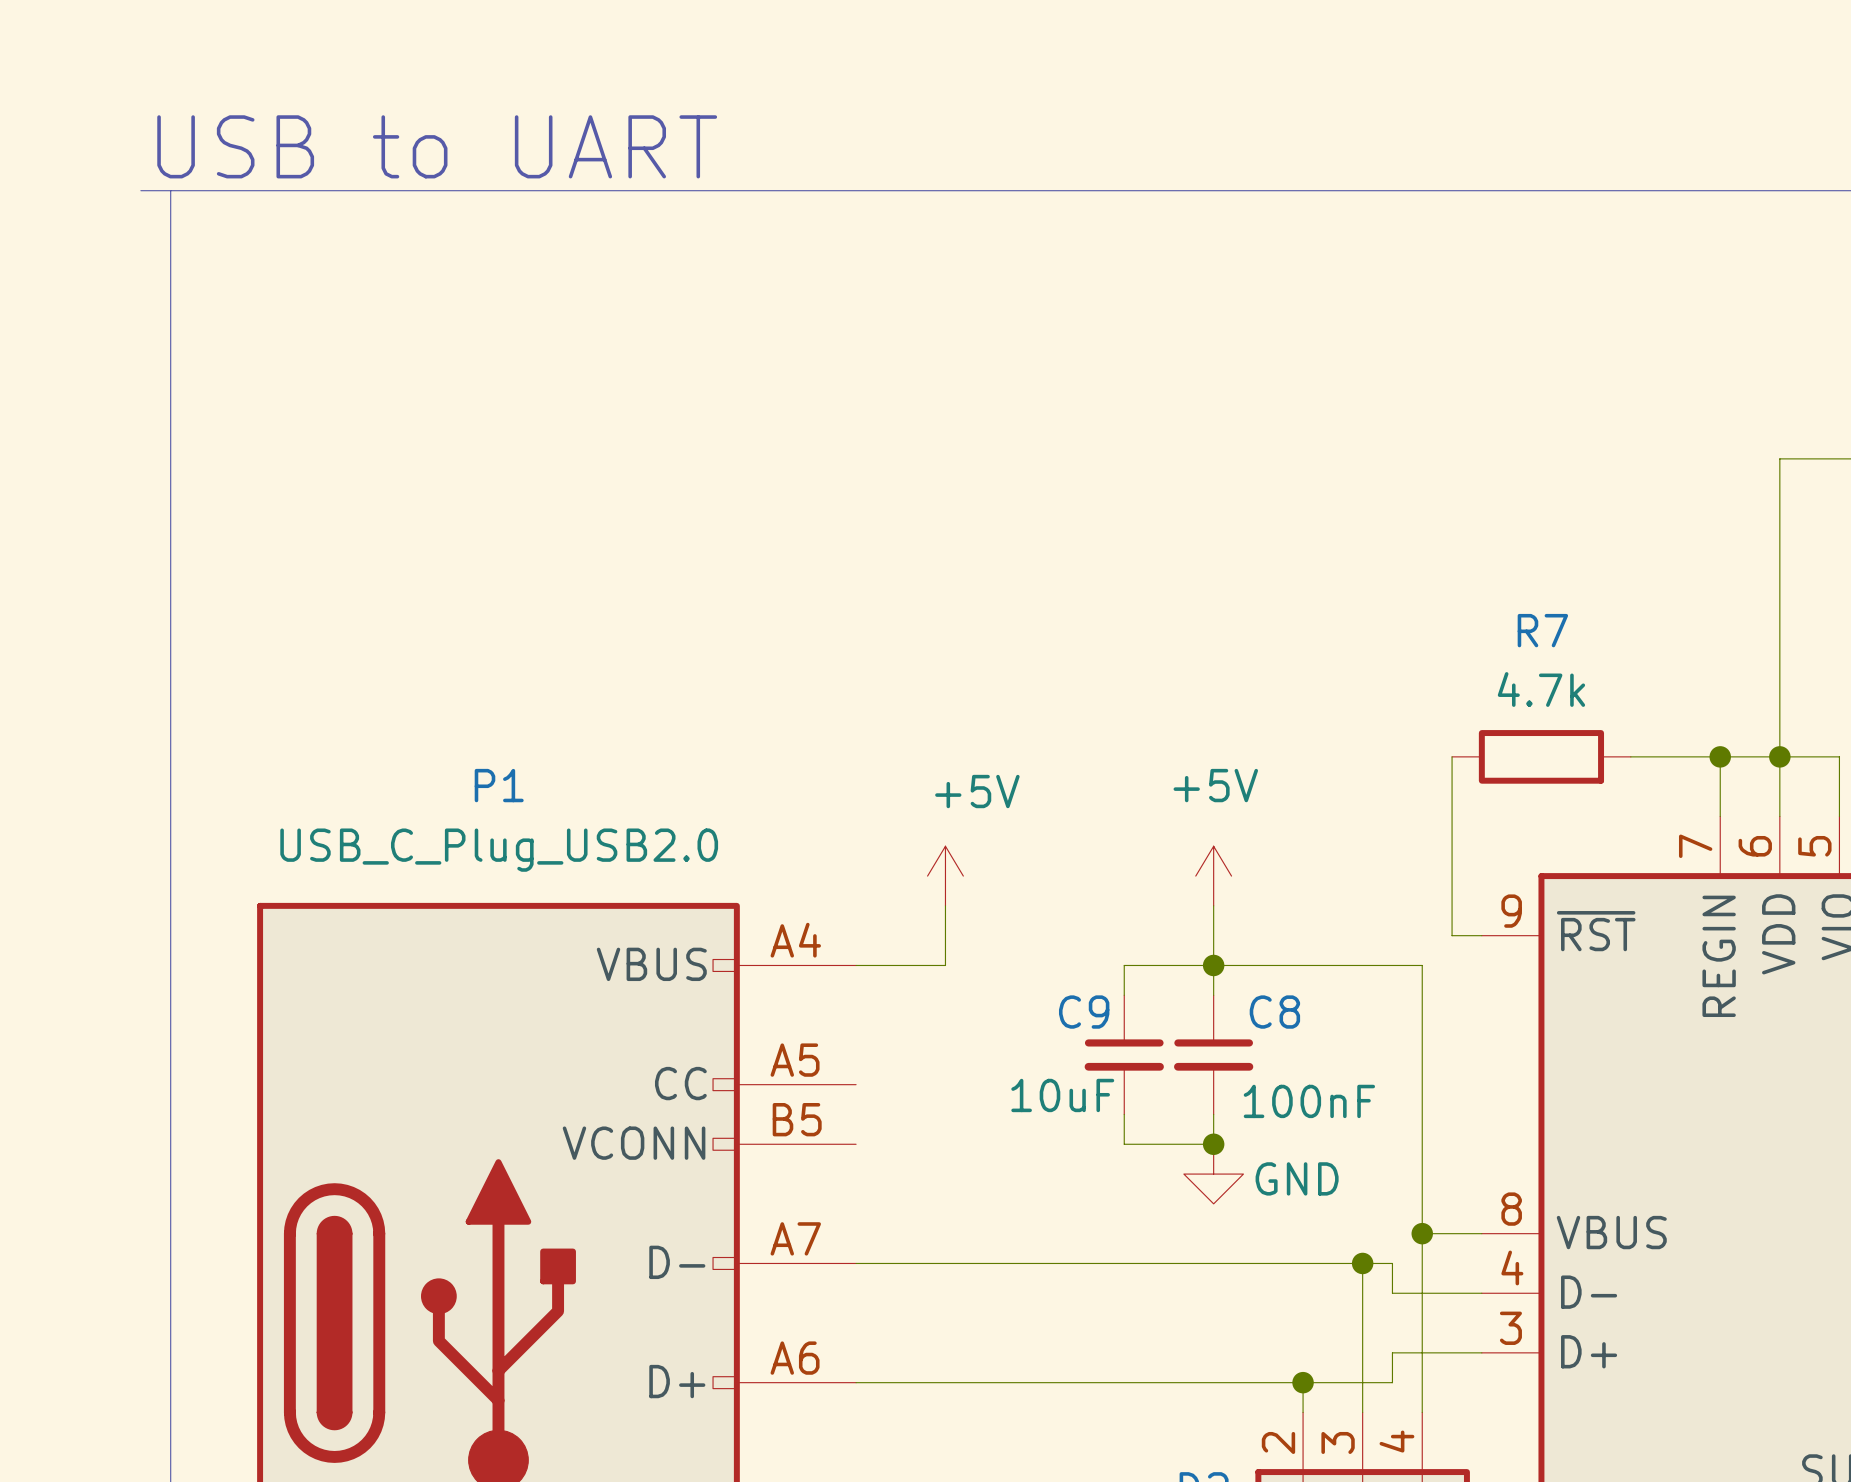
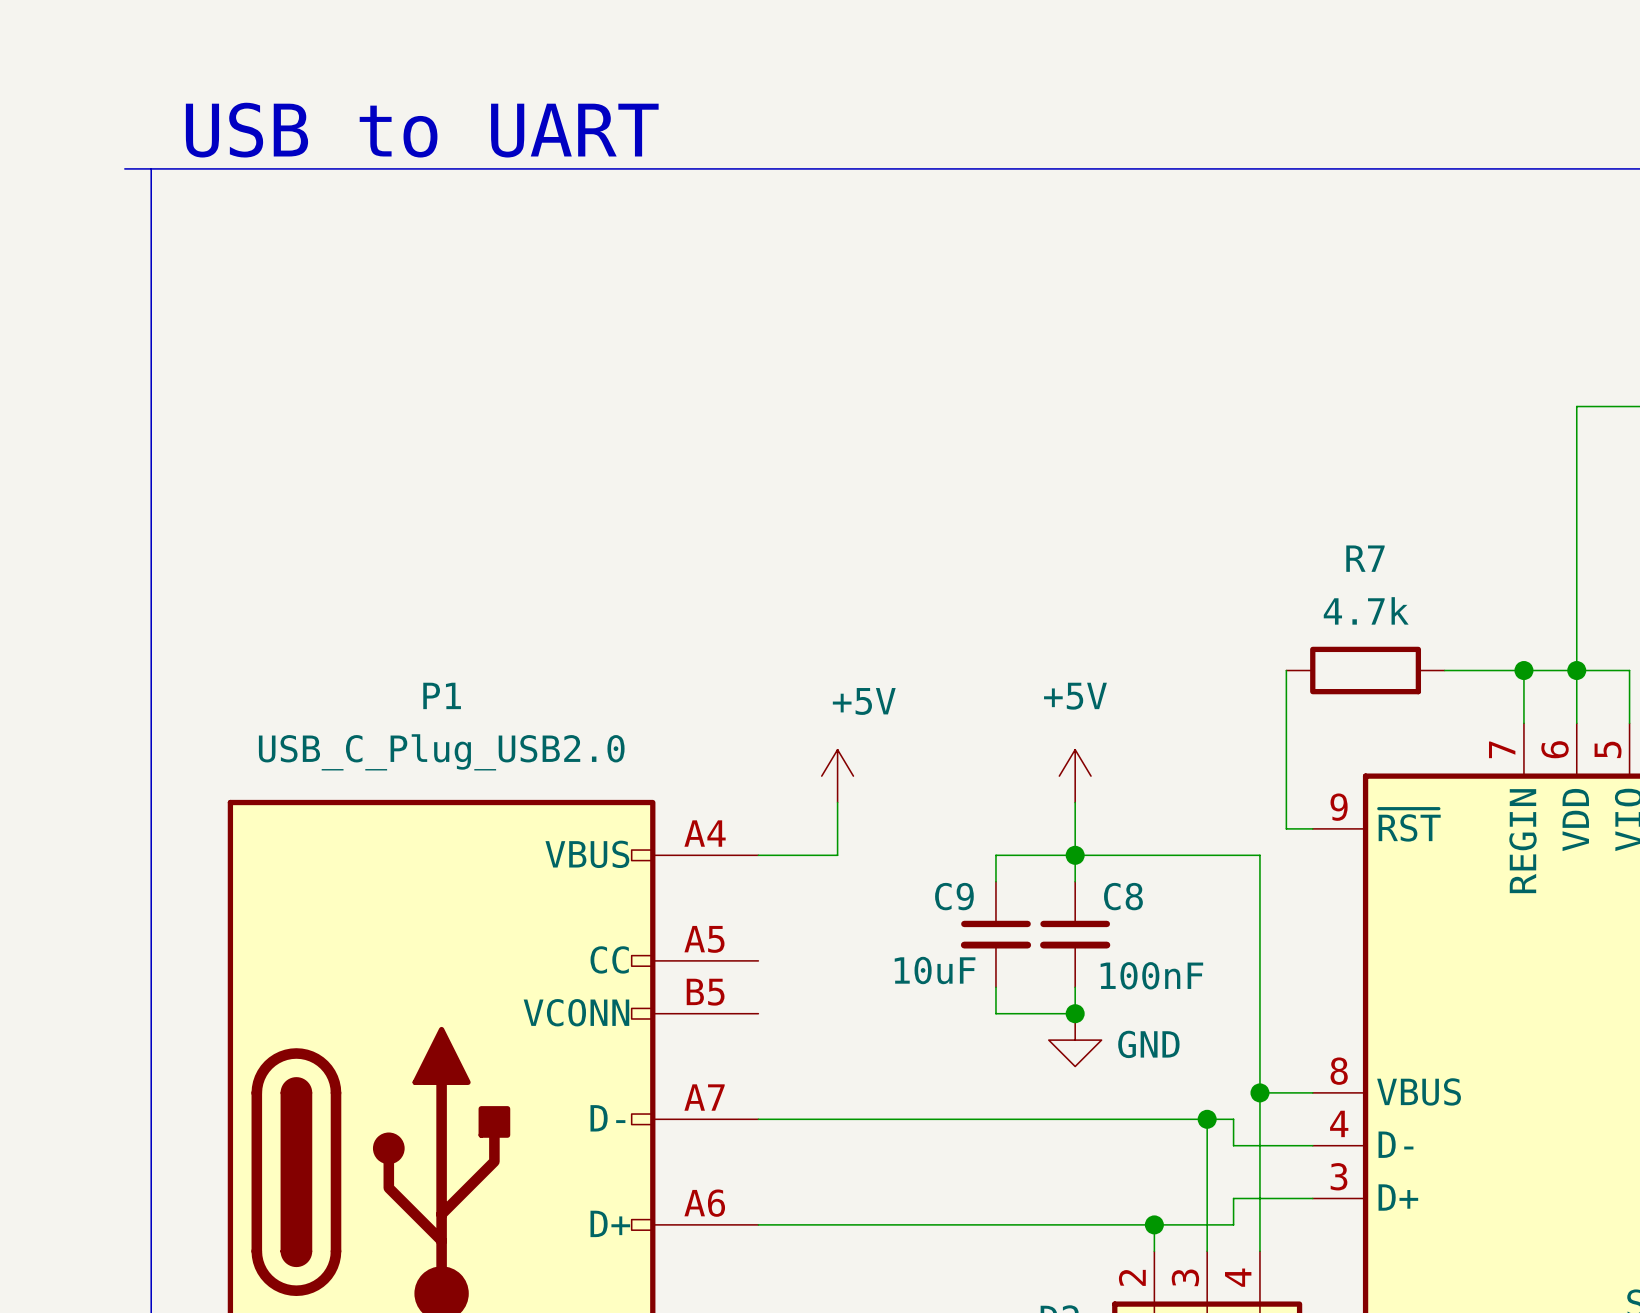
text position: USB to UART (437, 146) -> USB to UART (422, 130)

